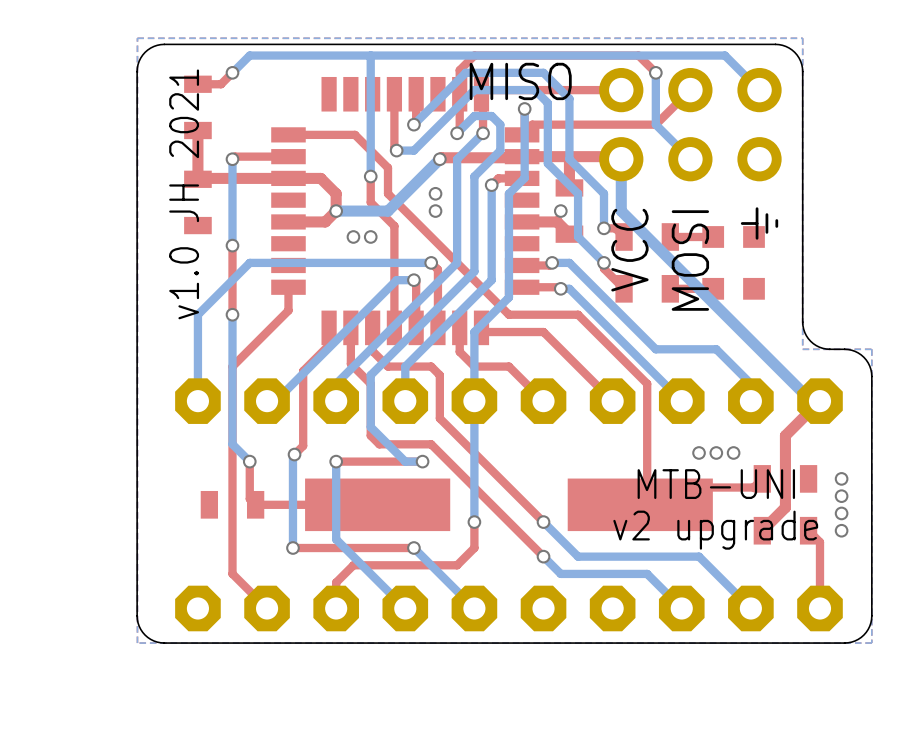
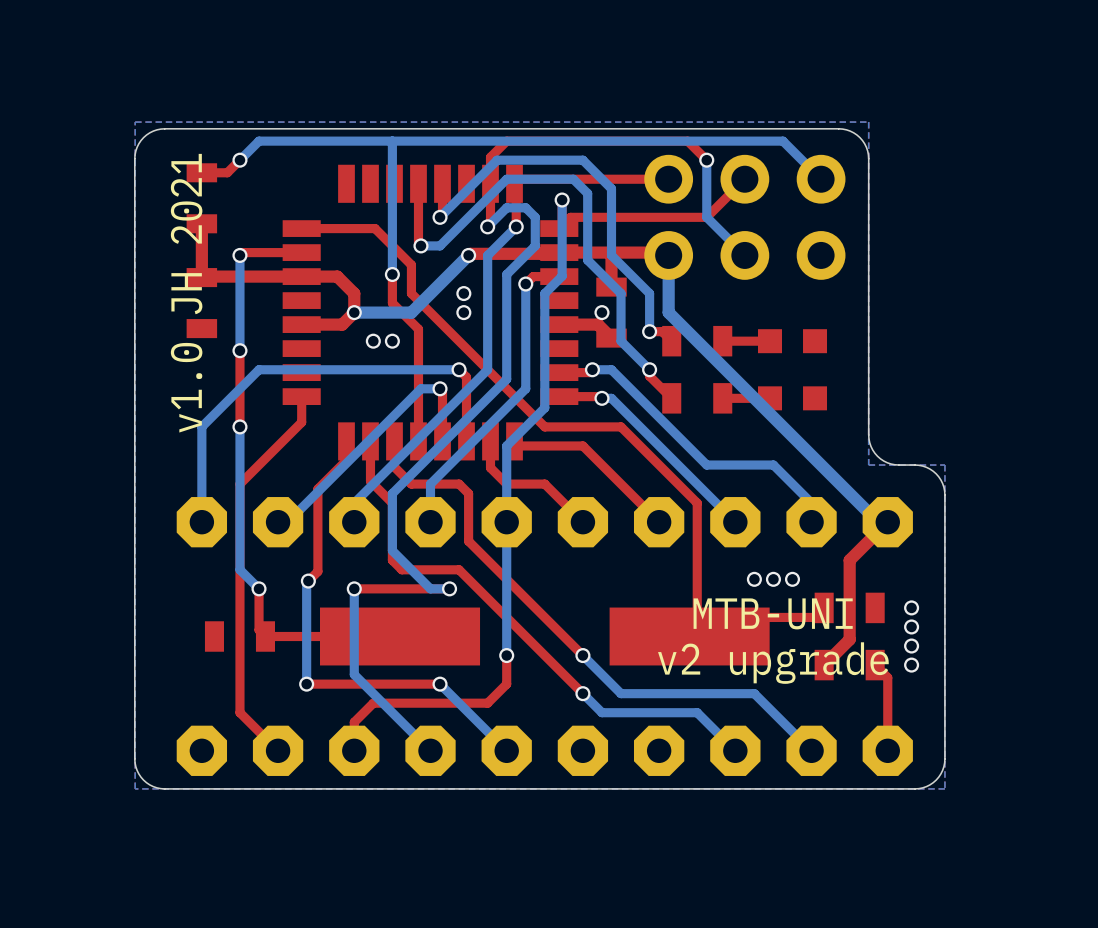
text: MISO (520, 81) -> none
text: ⏚ (759, 223) -> none
text: VCC (629, 250) -> none
text: MOSI (690, 260) -> none

